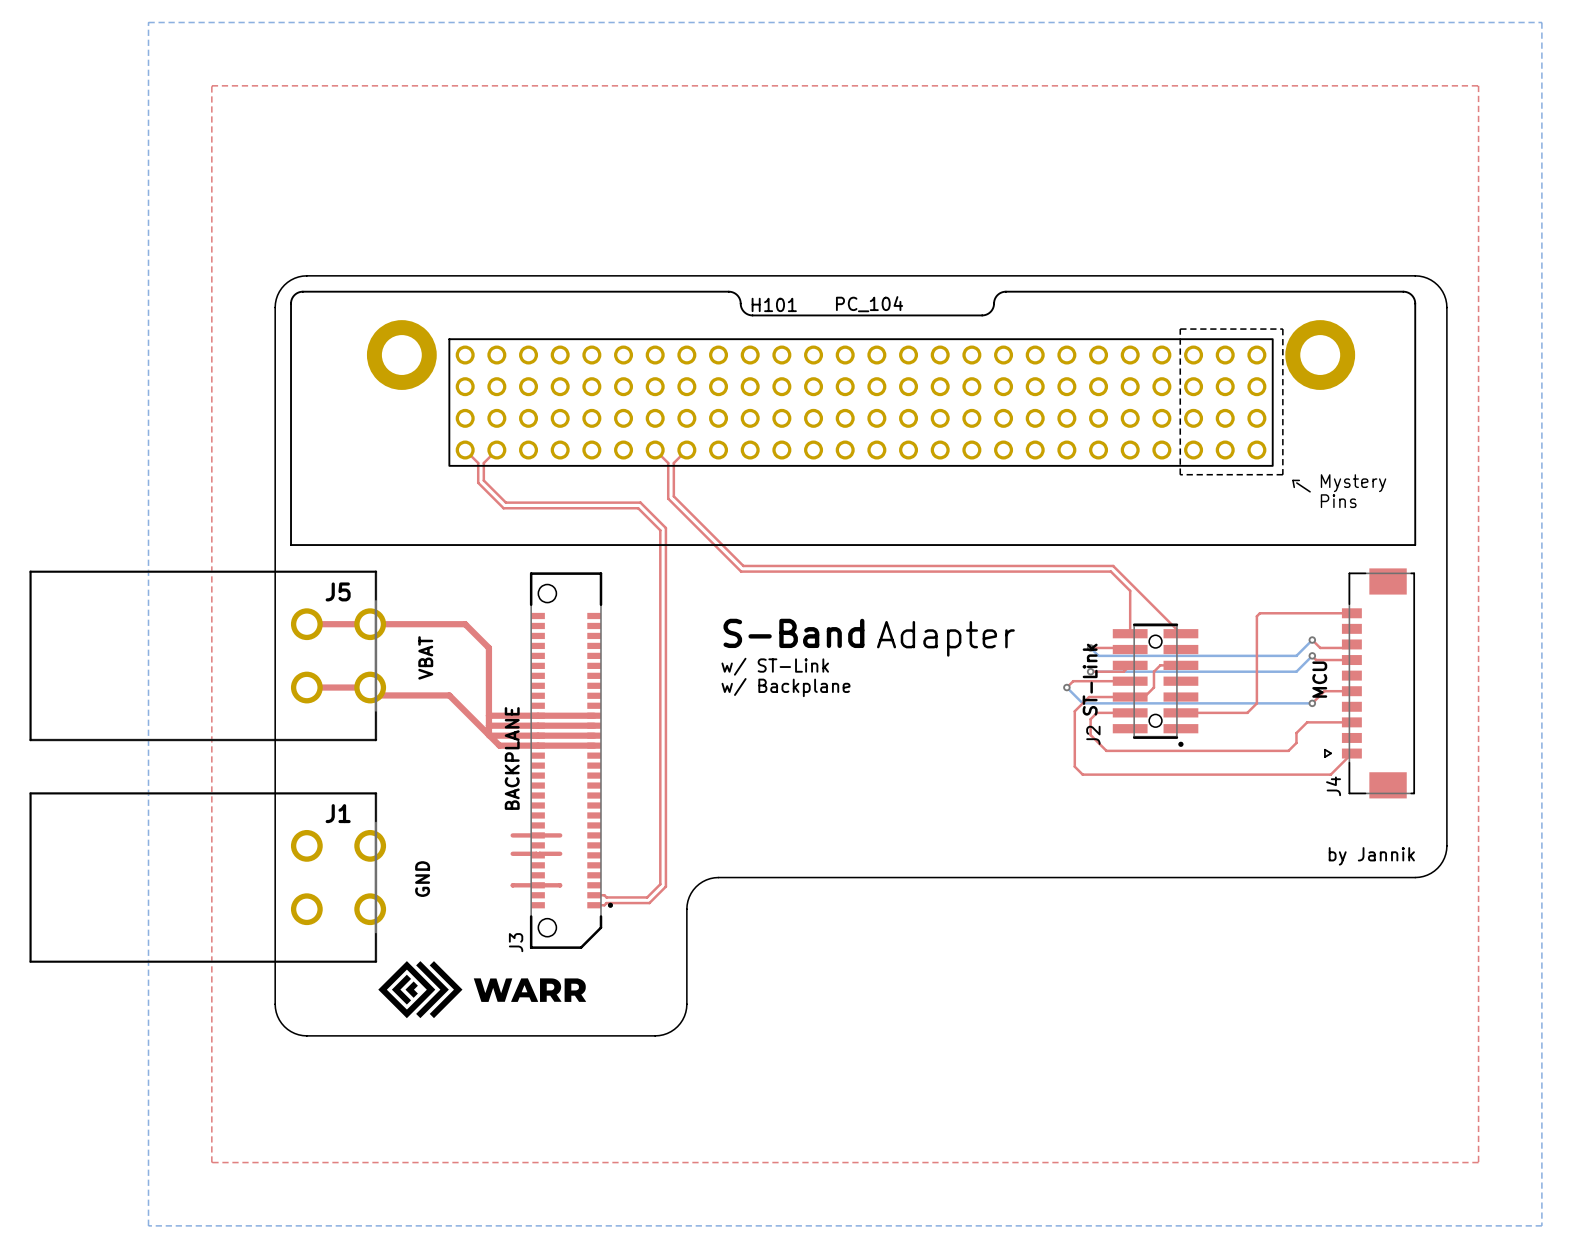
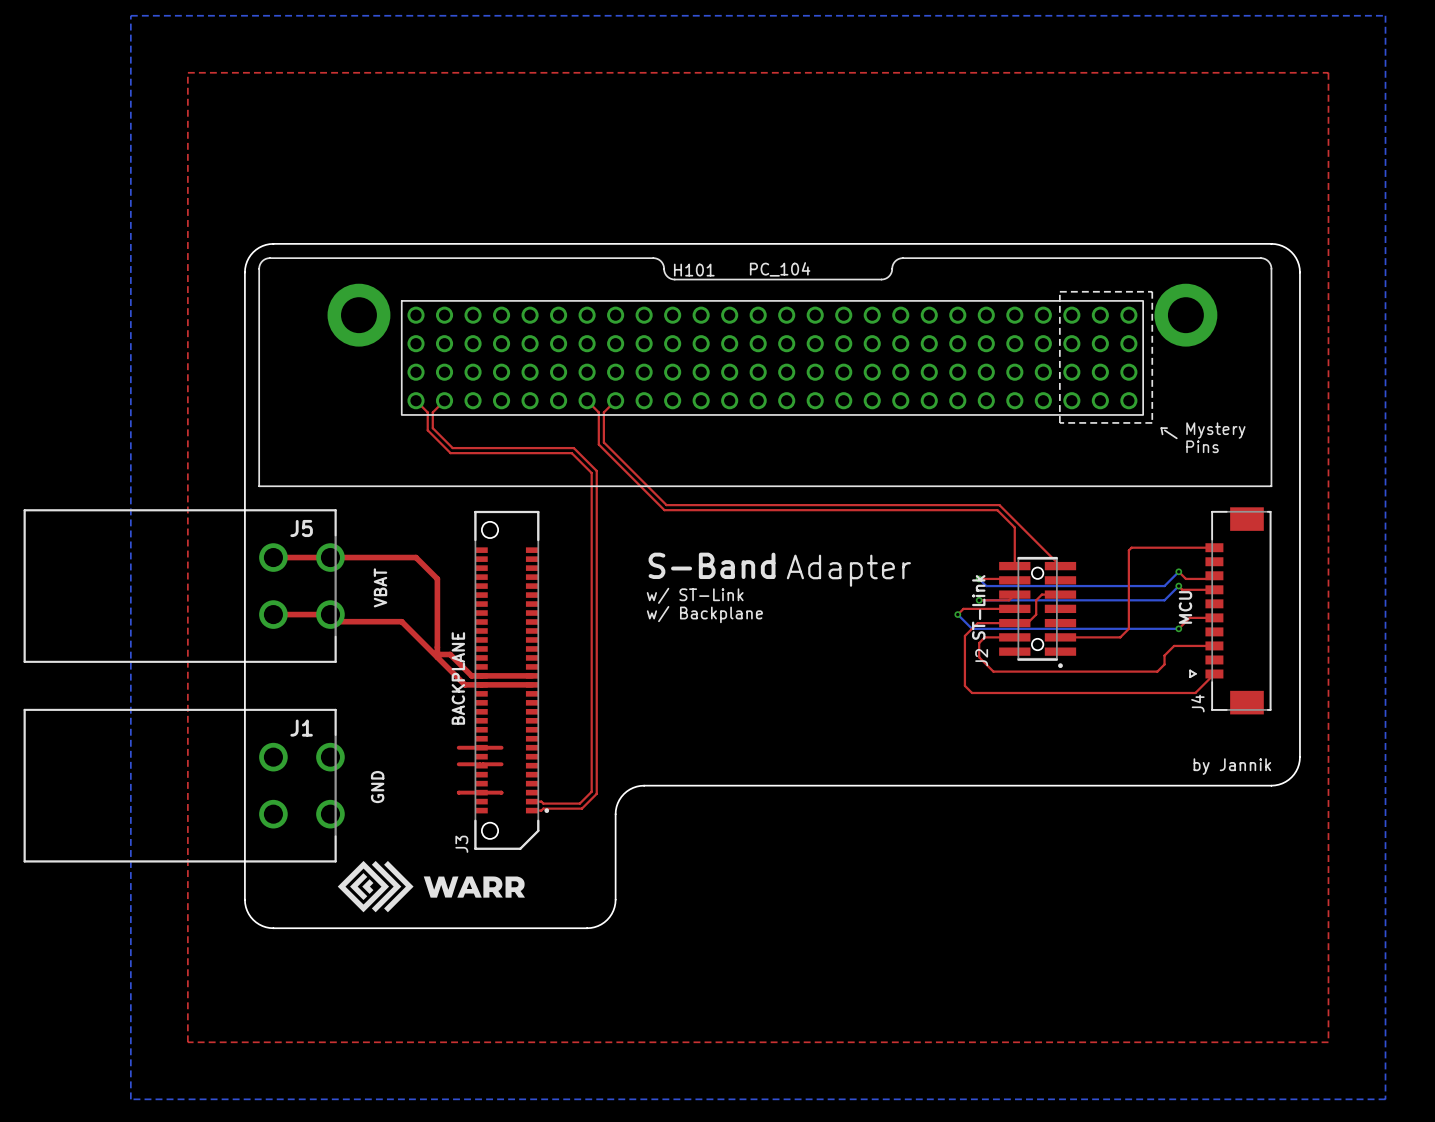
top track: (488, 715) (594, 715) -> none
top track: (488, 725) (594, 725) -> none
top track: none -> (437, 654) (450, 654) (471, 675) (532, 675)
top track: (489, 735) (594, 735) -> none
top track: (499, 745) (594, 745) -> (446, 666) (464, 684) (532, 684)

